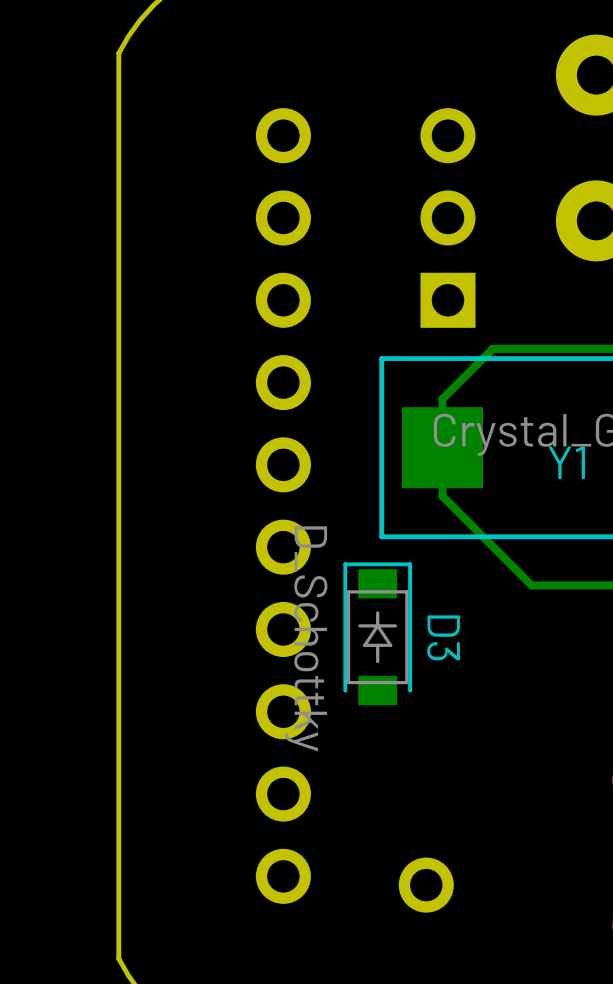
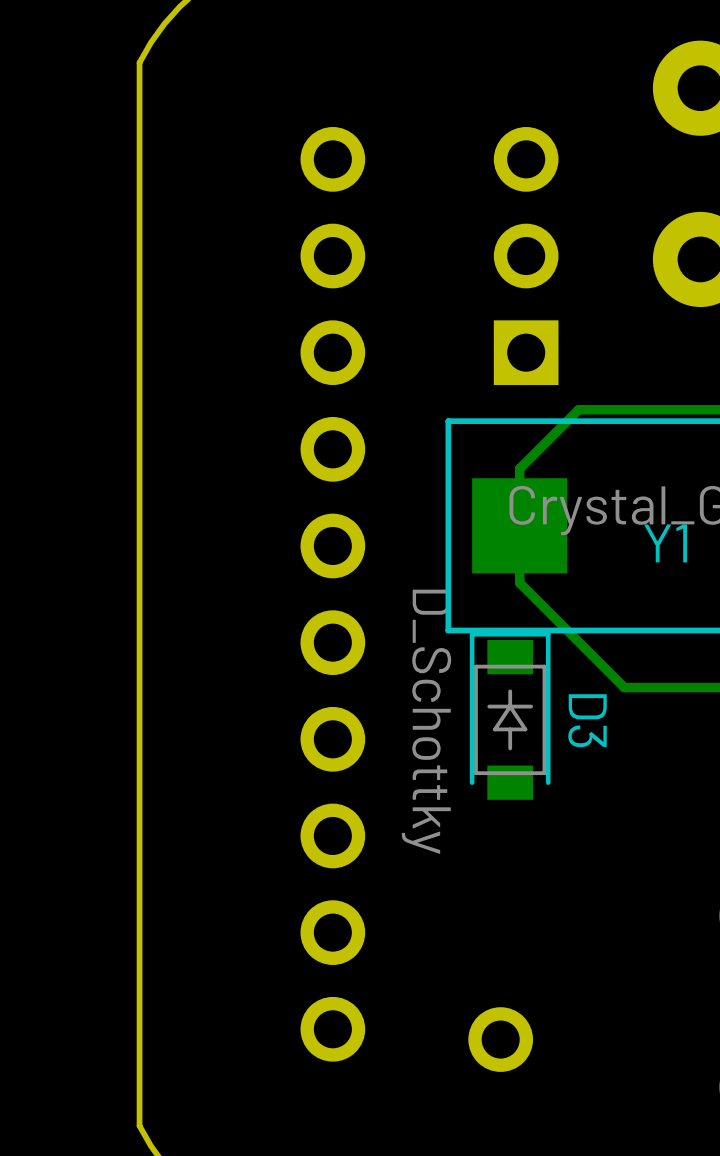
D3 position: (377, 633) -> (510, 715)

